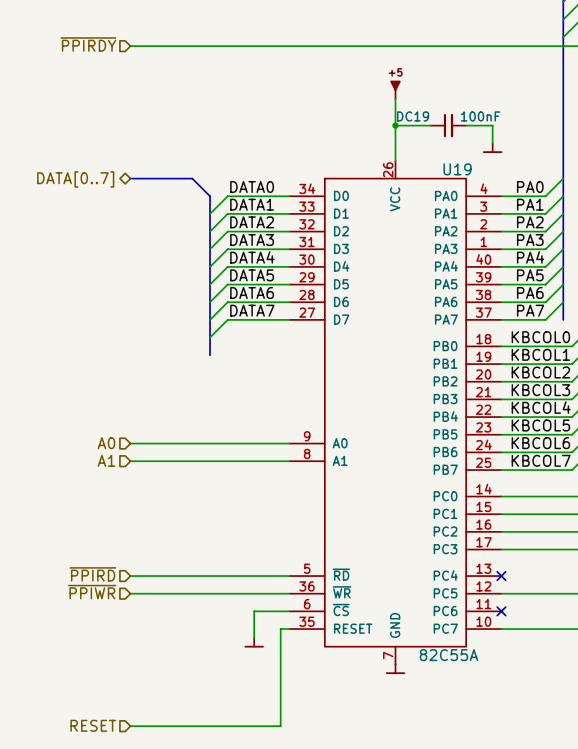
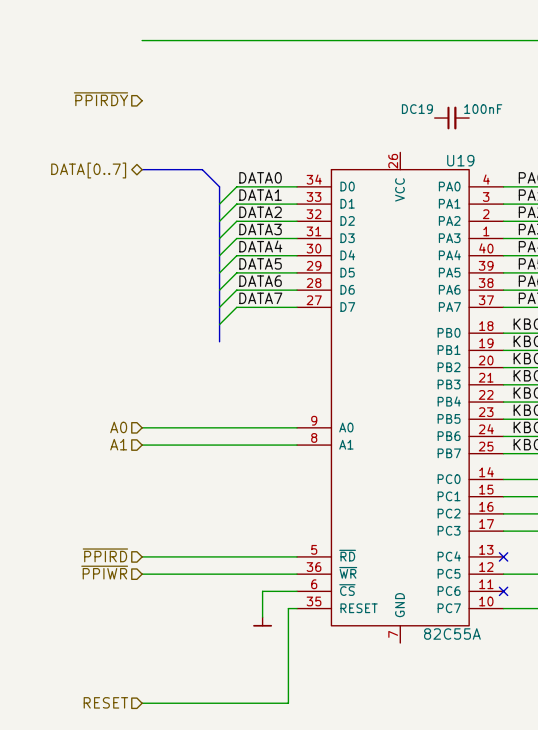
hierarchical label position: ~{PPIRDY} (88, 44) -> ~{PPIRDY} (100, 99)
power symbol: (395, 90) -> none
wire: (395, 99) (395, 160) -> none
wire: (395, 125) (430, 125) -> none
junction: (395, 125) -> none
wire: (466, 125) (492, 125) (492, 143) -> none
power symbol: (492, 148) -> none
power symbol: (395, 669) -> none

